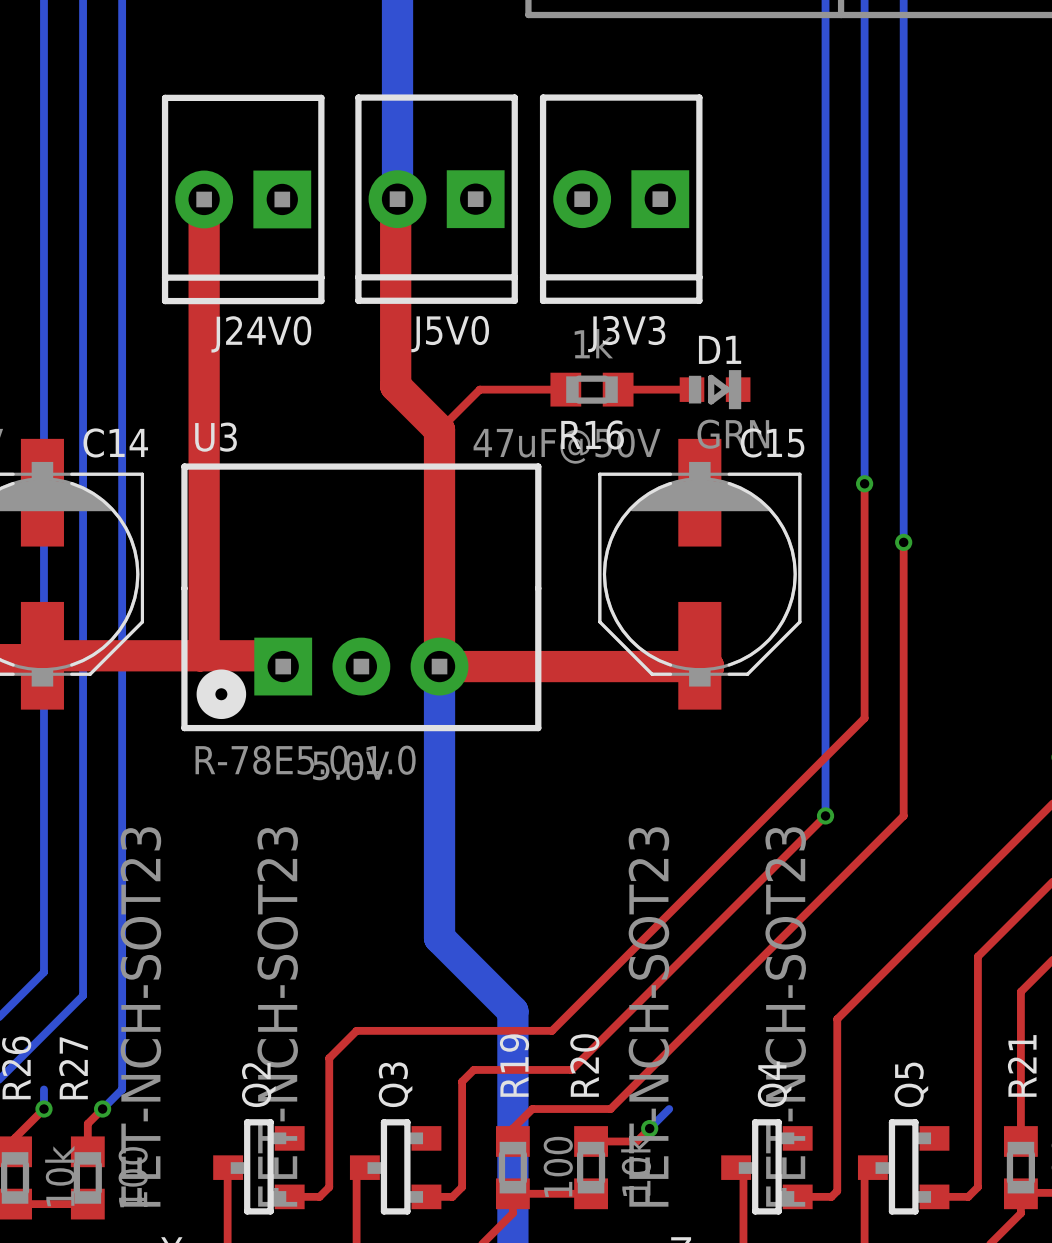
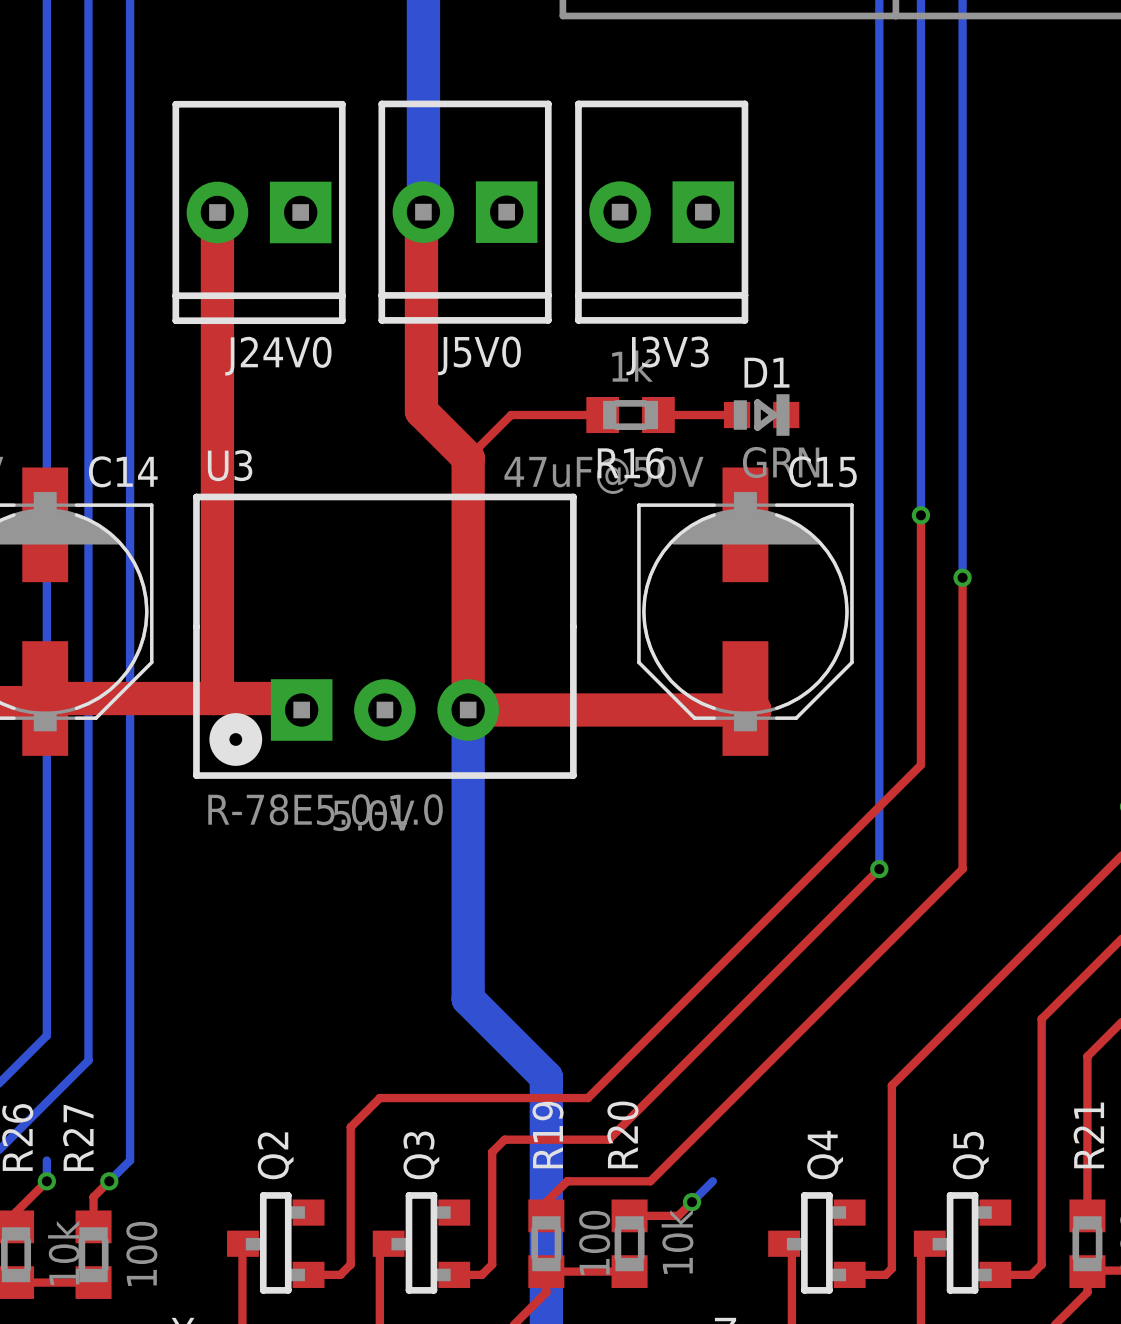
Q2 value: FET-NCH-SOT23 (140, 1016) -> none
Q3 value: FET-NCH-SOT23 (277, 1016) -> none
Q4 value: FET-NCH-SOT23 (648, 1016) -> none
Q5 value: FET-NCH-SOT23 (785, 1016) -> none

